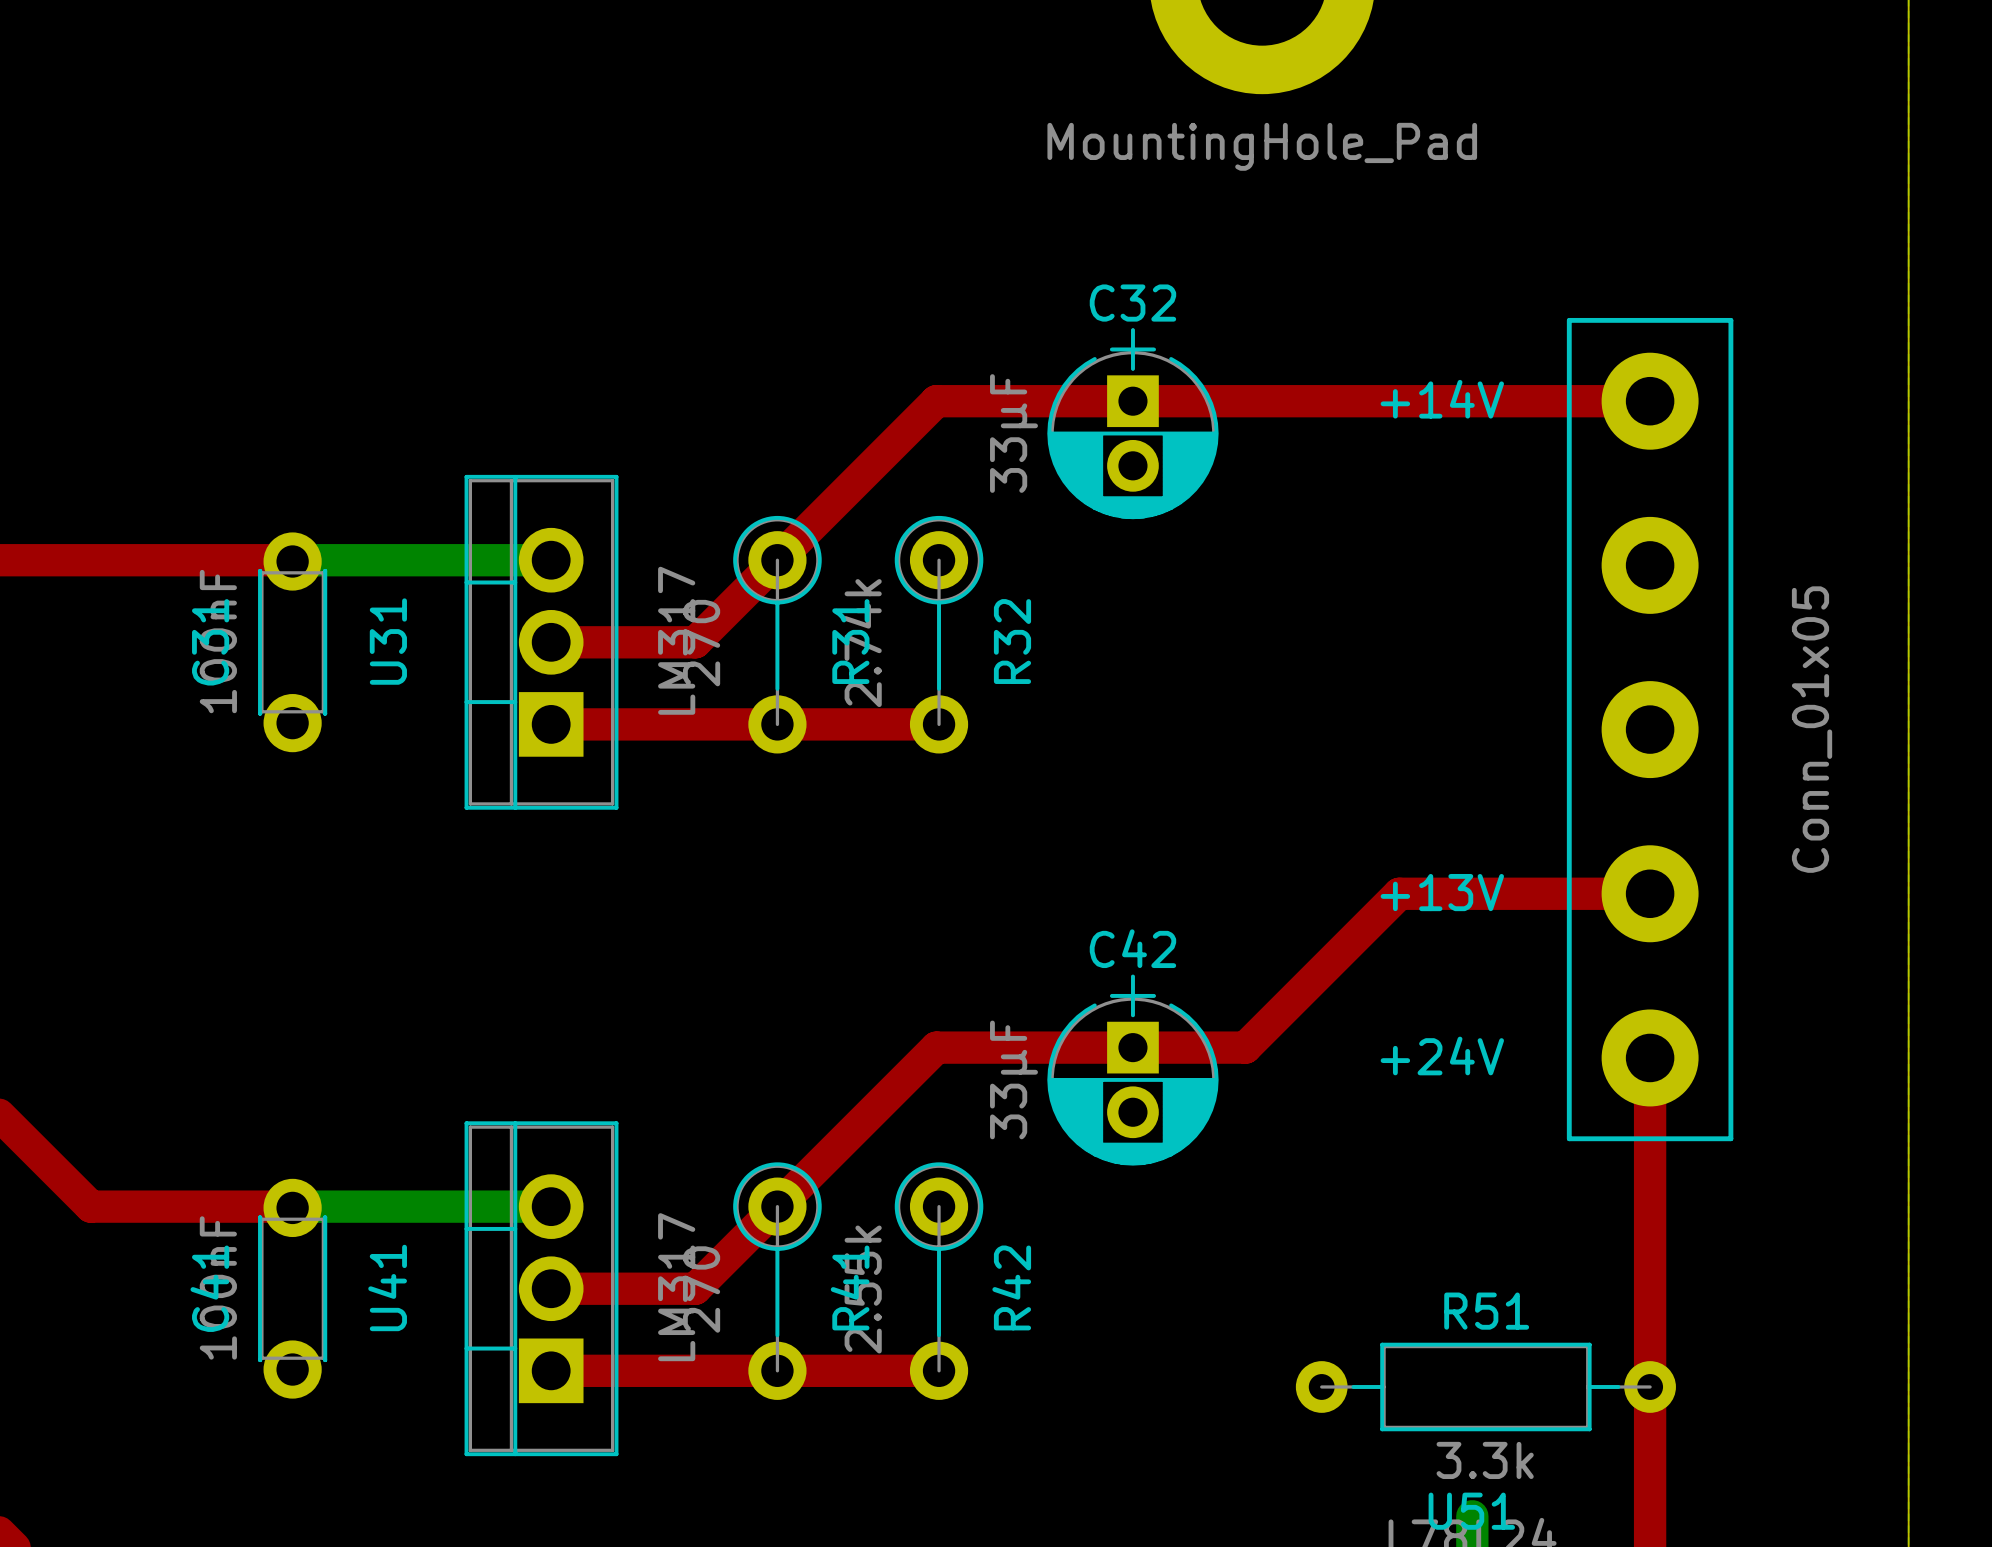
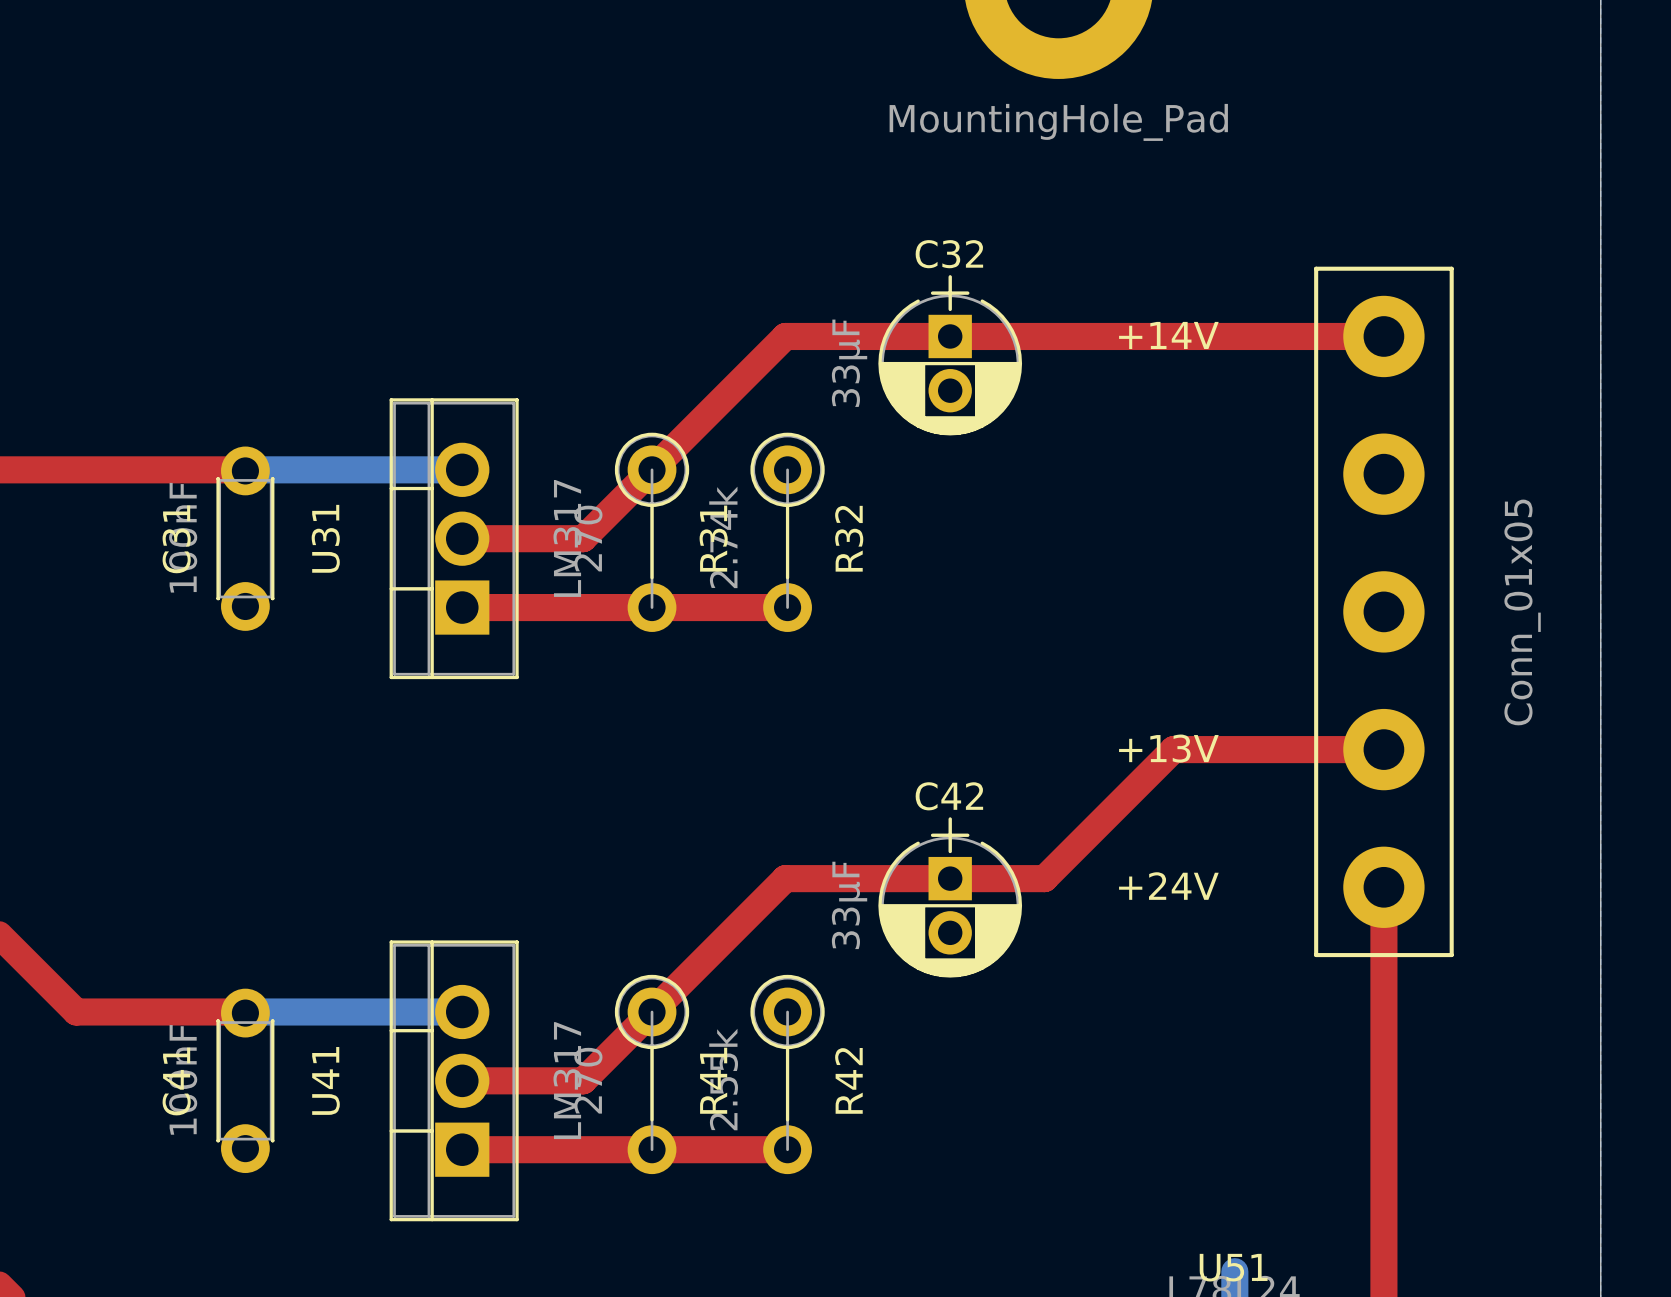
text position: +14V (1442, 399) -> +14V (1168, 335)
text position: +13V (1442, 892) -> +13V (1168, 748)
text position: +24V (1442, 1055) -> +24V (1168, 886)
R51: 3.3k (1485, 1386) -> none

